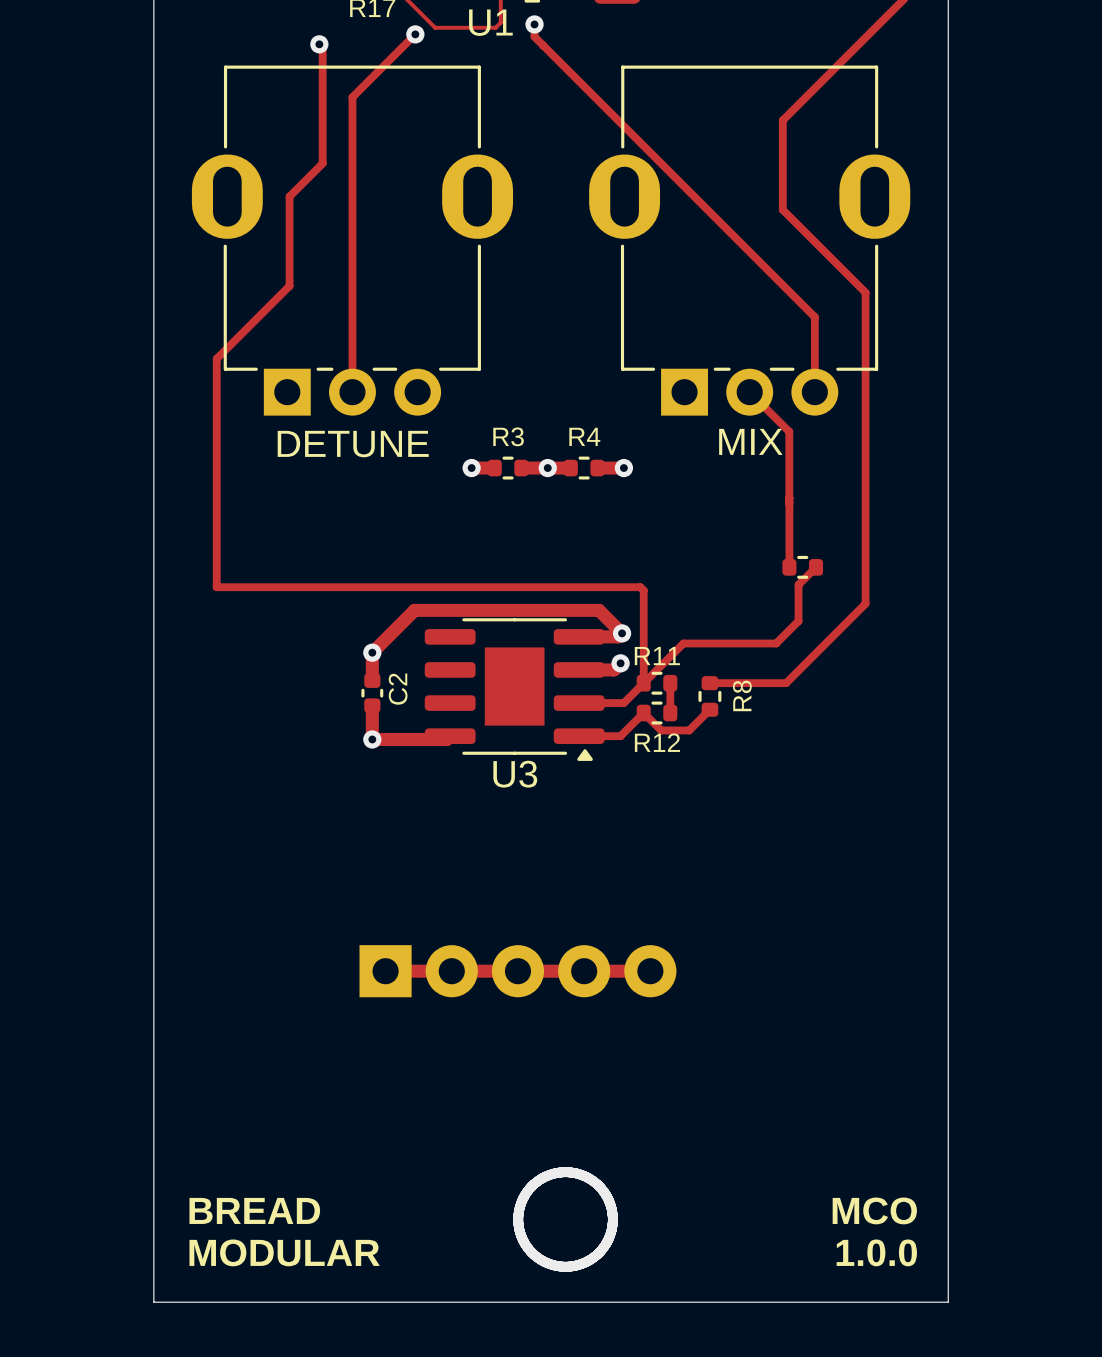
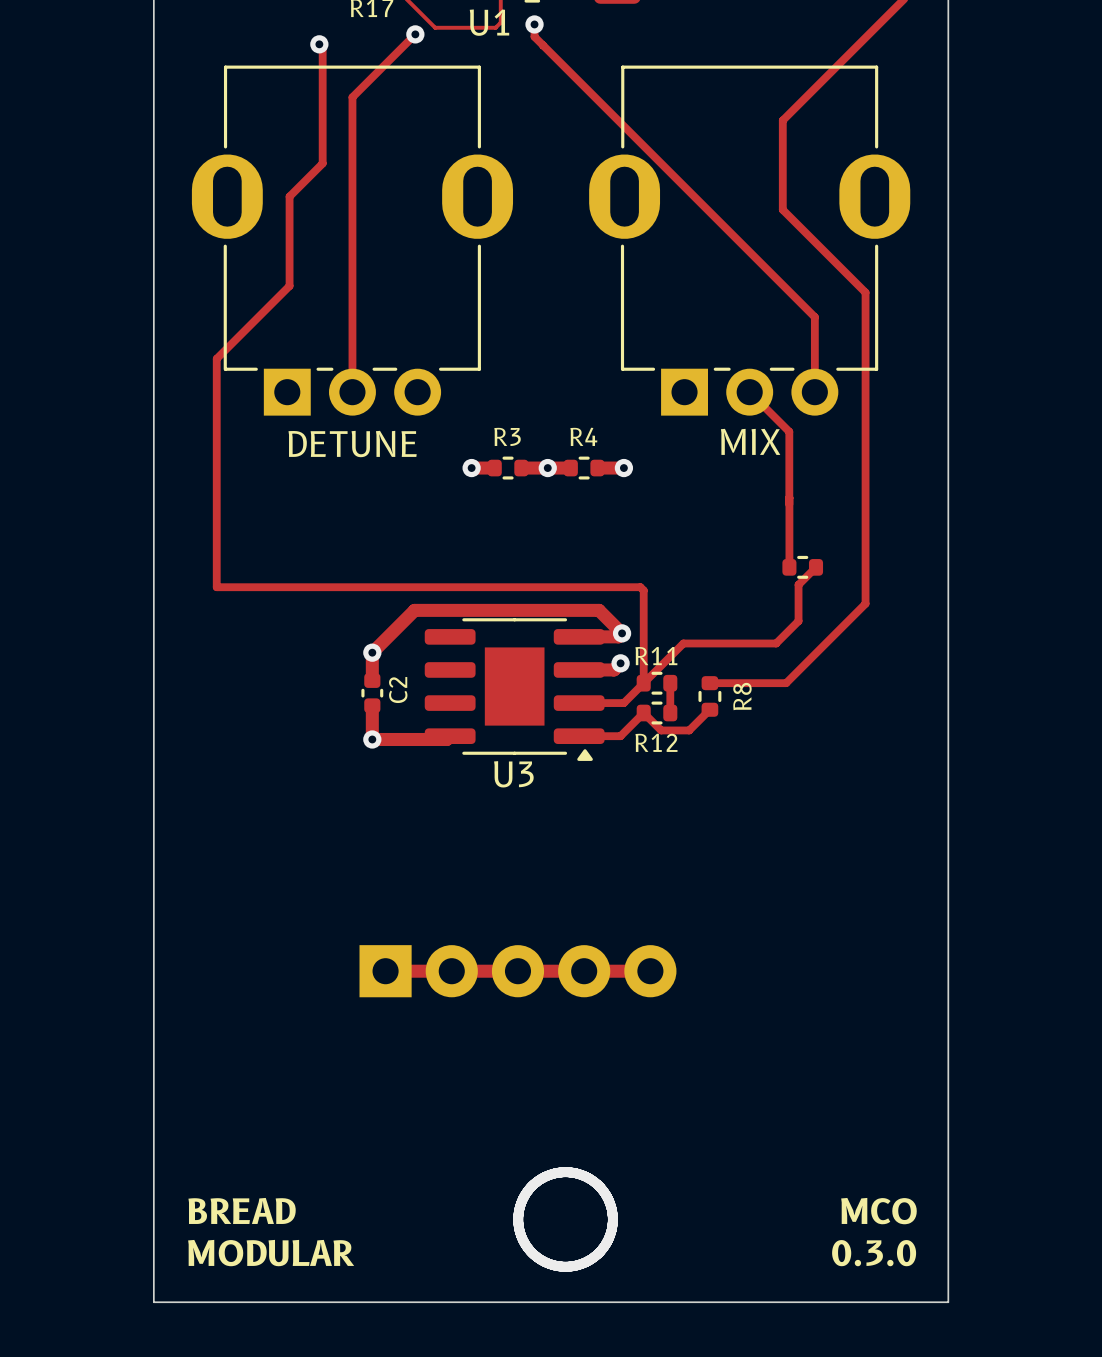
text: 1.0.0 (876, 1252) -> 0.3.0 (874, 1253)

